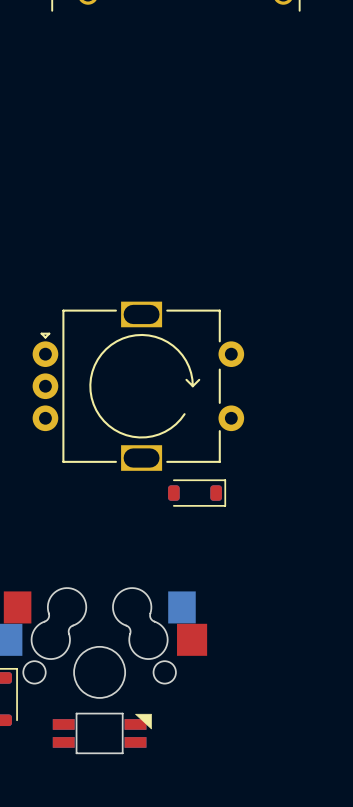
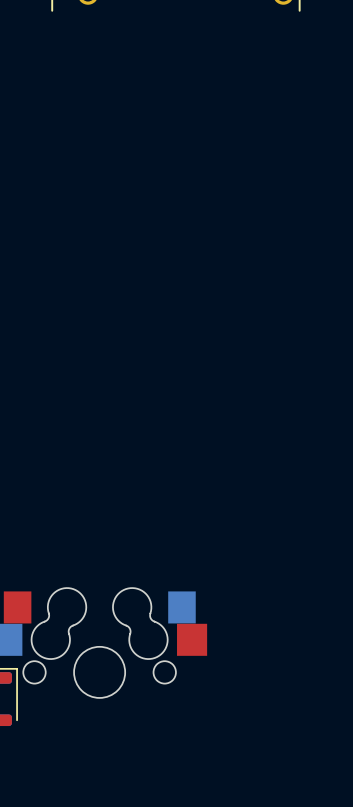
part: (138, 386) -> none
part: (197, 493) -> none
part: (102, 733) -> none

